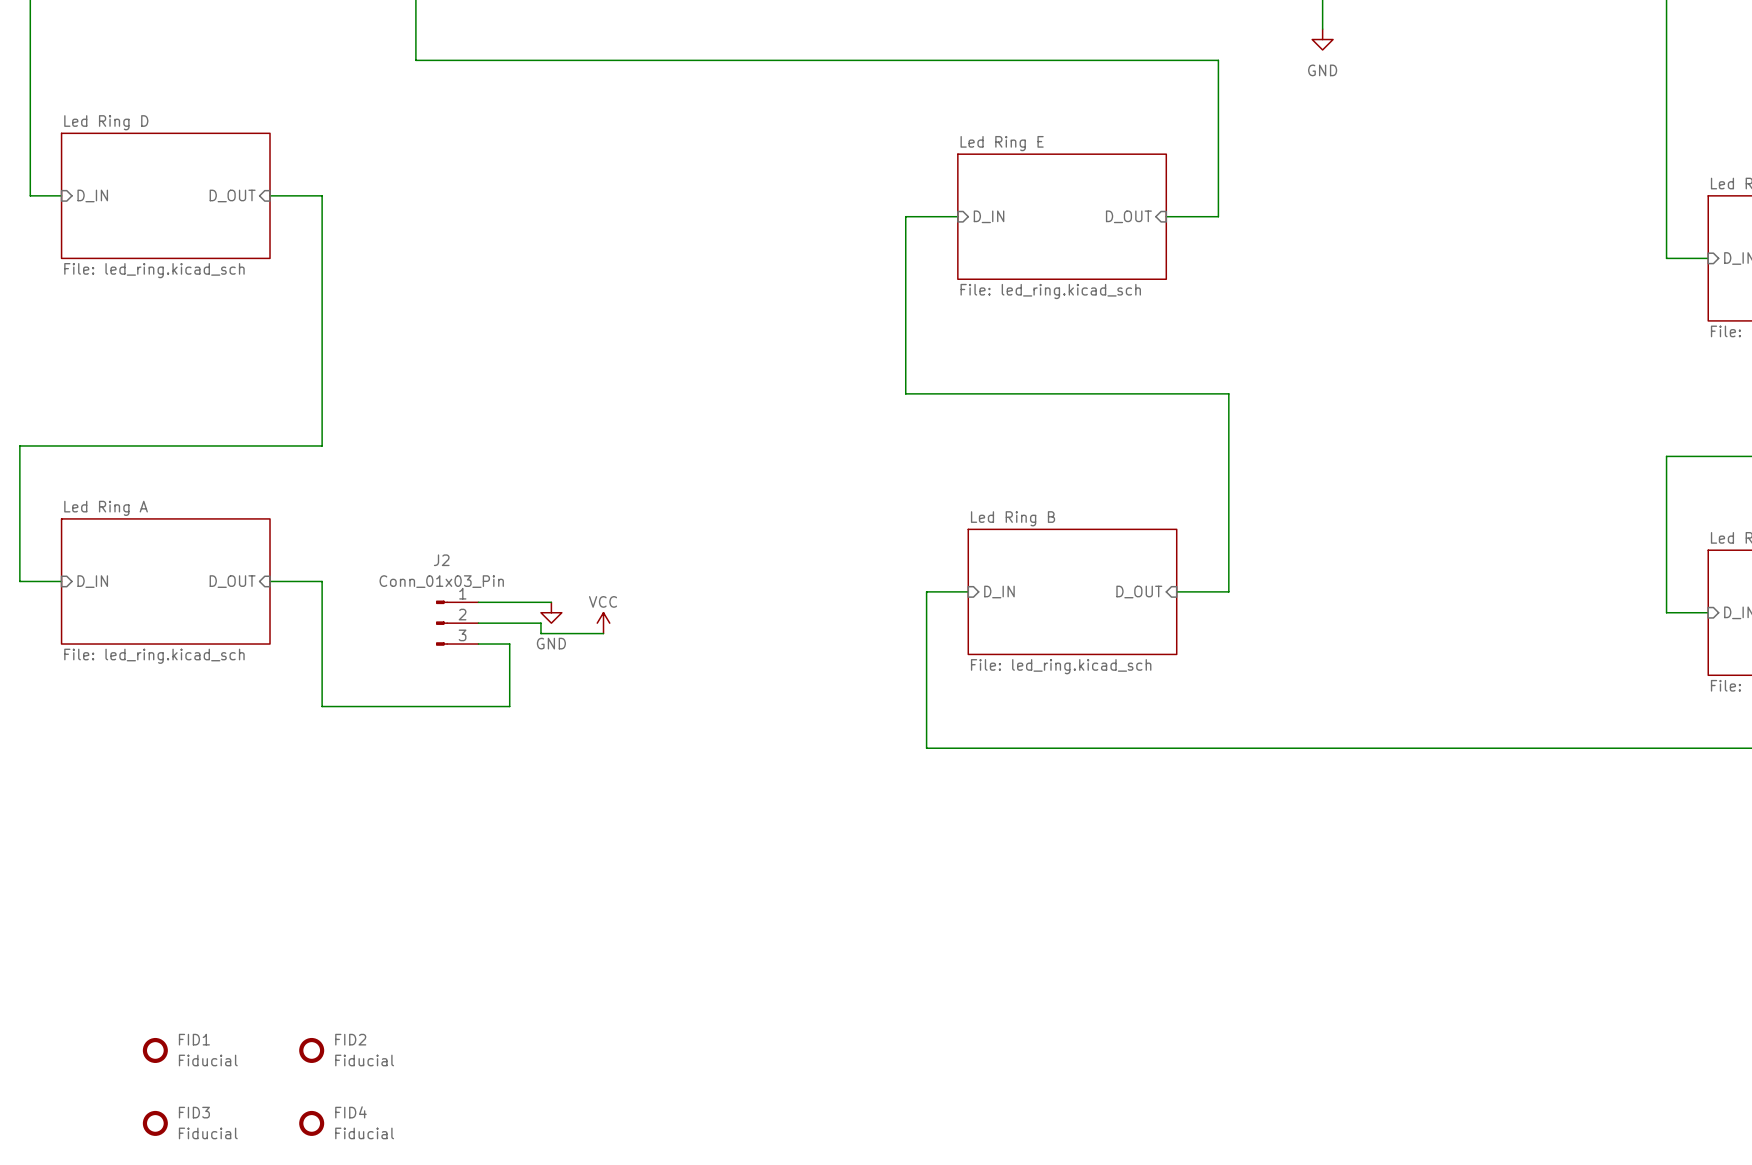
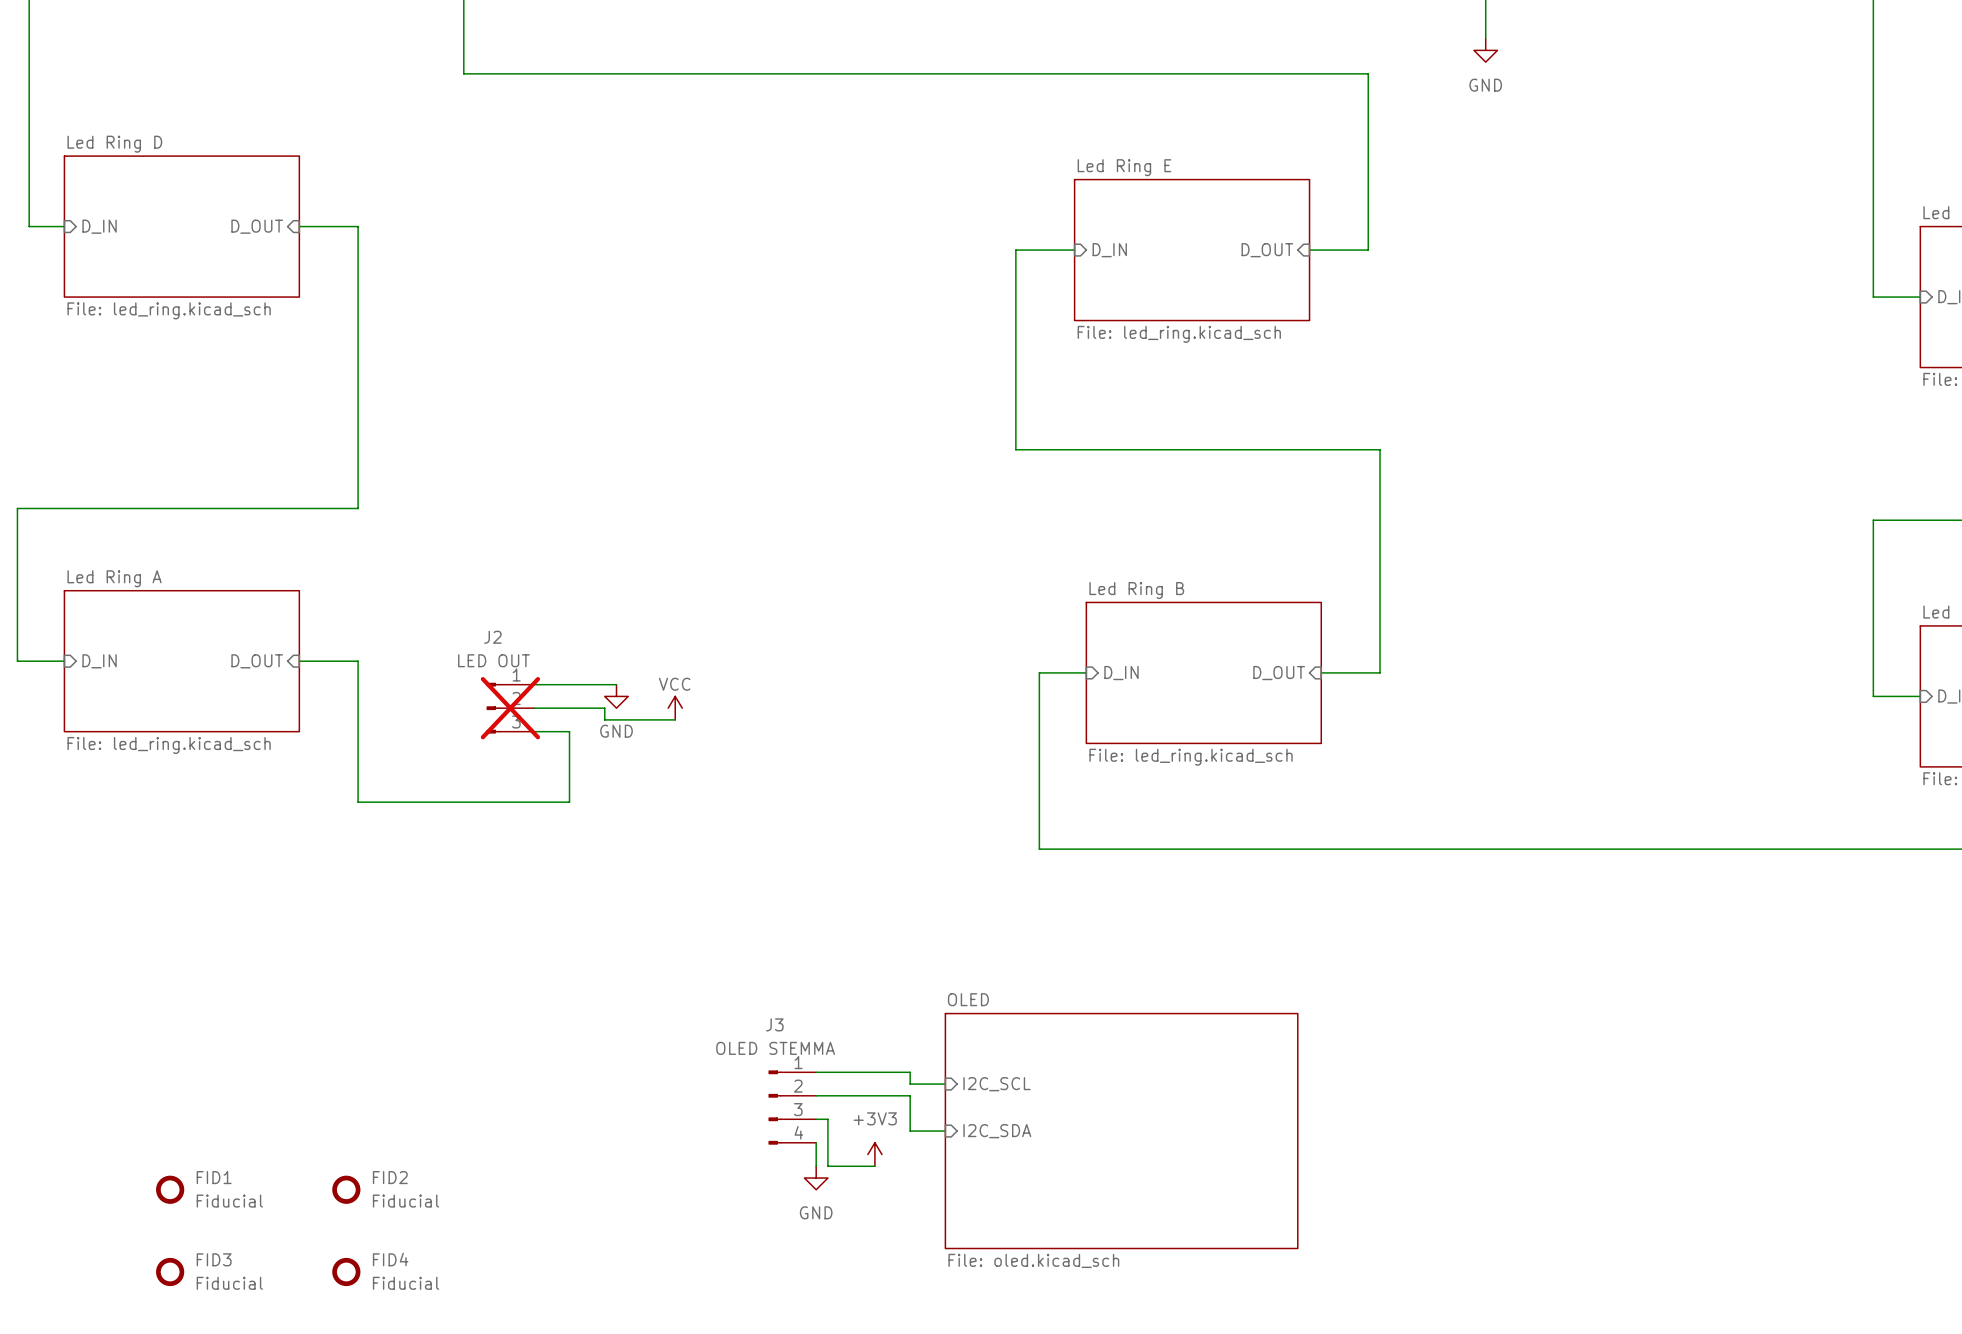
J2 value: Conn_01x03_Pin (441, 581) -> LED OUT (494, 660)
J2 do-not-place cross: none -> (510, 708)
wire: none -> (816, 1072) (910, 1072) (910, 1084) (945, 1084)
sheet pin: none -> I2C_SCL (997, 1084)
wire: none -> (816, 1095) (910, 1095) (910, 1131) (945, 1131)
J3: none -> OLED STEMMA (792, 1107)
wire: none -> (816, 1119) (827, 1119) (827, 1166) (874, 1166)
sheet pin: none -> I2C_SDA (997, 1131)
sheet OLED: none -> File: oled.kicad_sch (1121, 1131)
wire: none -> (816, 1142) (816, 1166)
power symbol: none -> +3V3 (874, 1154)
power symbol: none -> GND (816, 1178)

